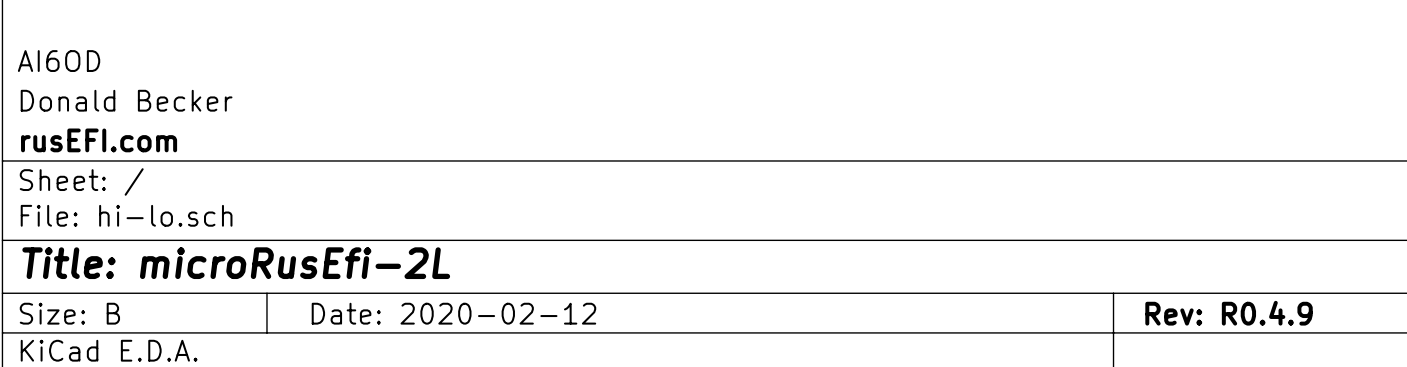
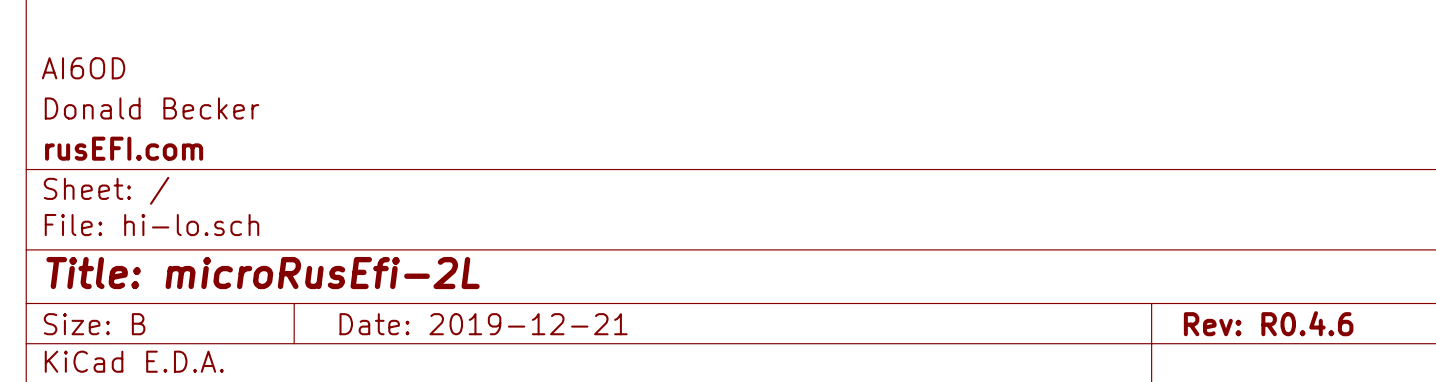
title block: Date: 2020-02-12 (453, 313) -> Date: 2019-12-21 (483, 324)
title block: Rev: R0.4.9 (1229, 313) -> Rev: R0.4.6 (1268, 323)

